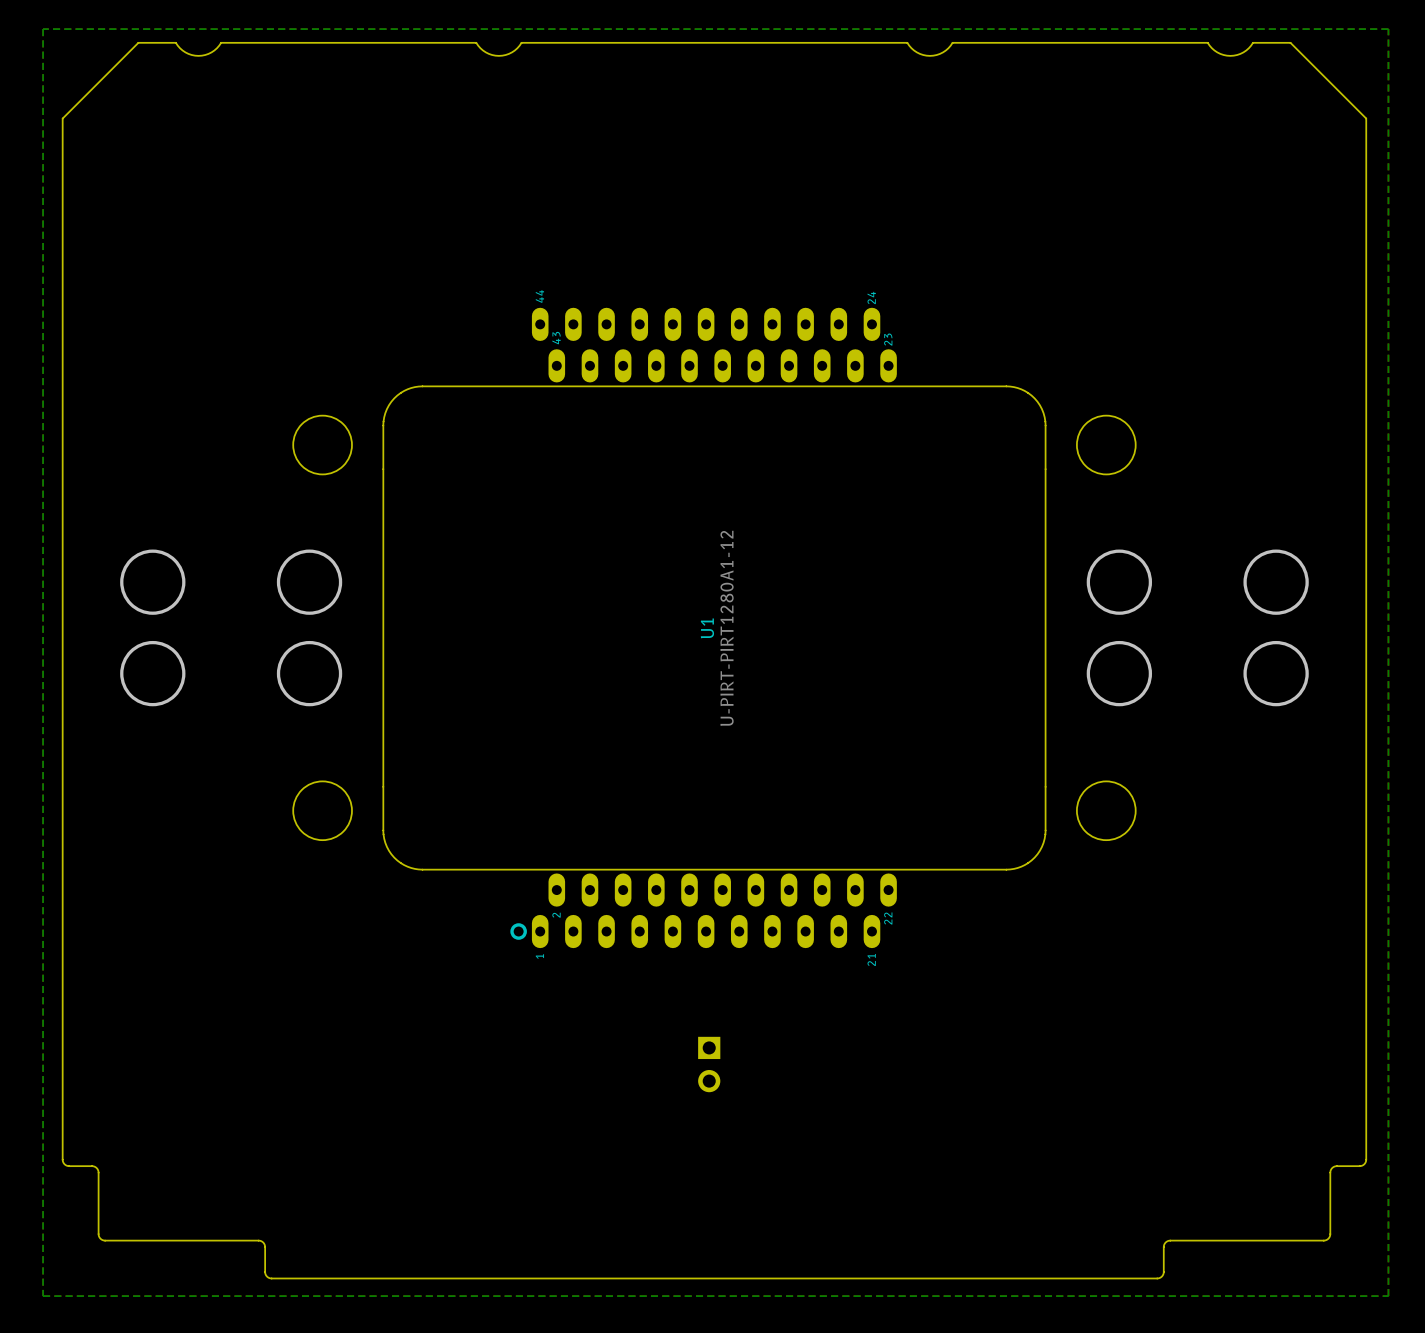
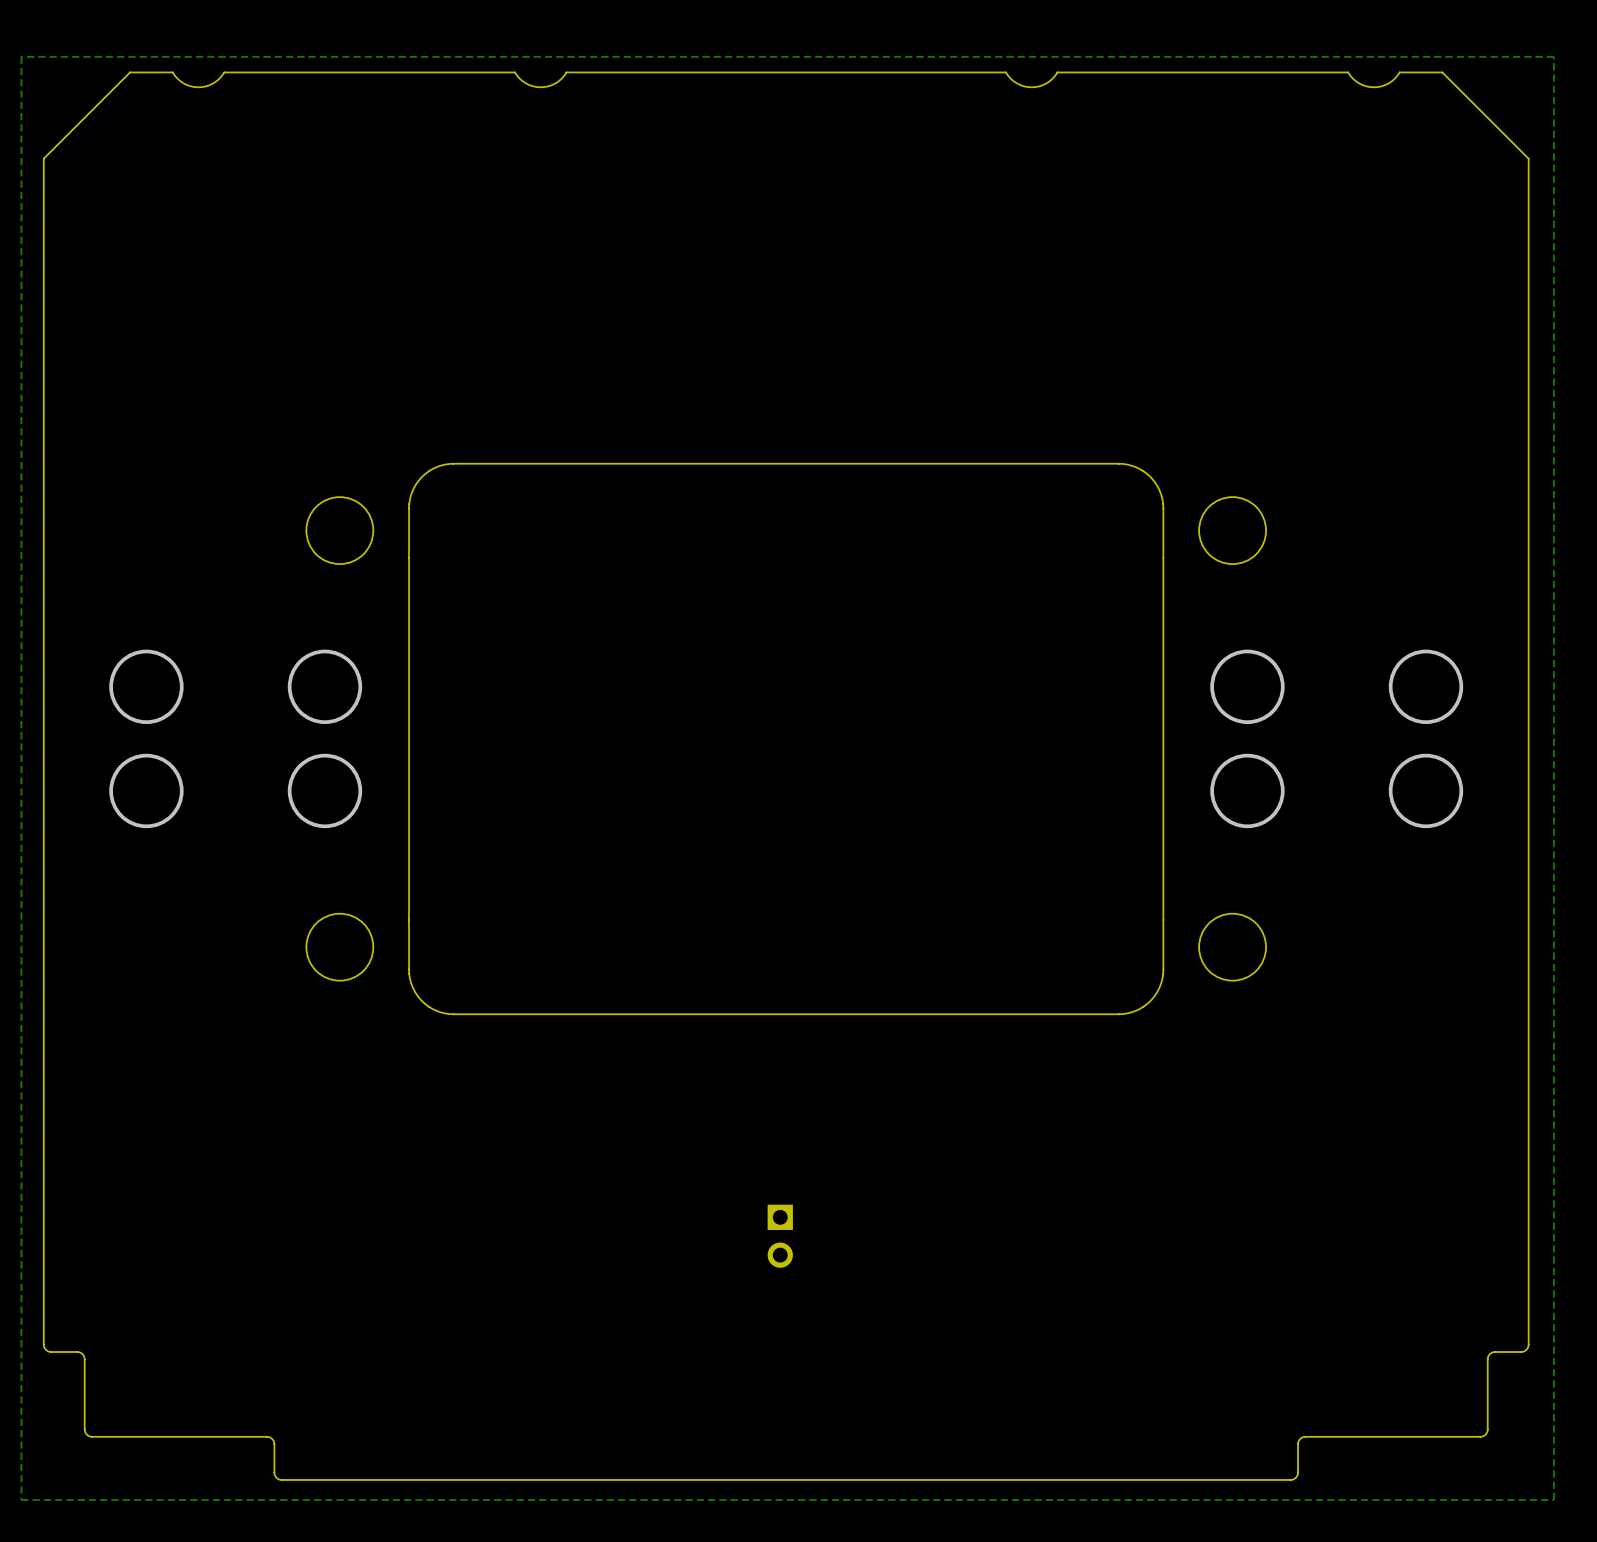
U1: U-PIRT-PIRT1280A1-12 (703, 627) -> none

